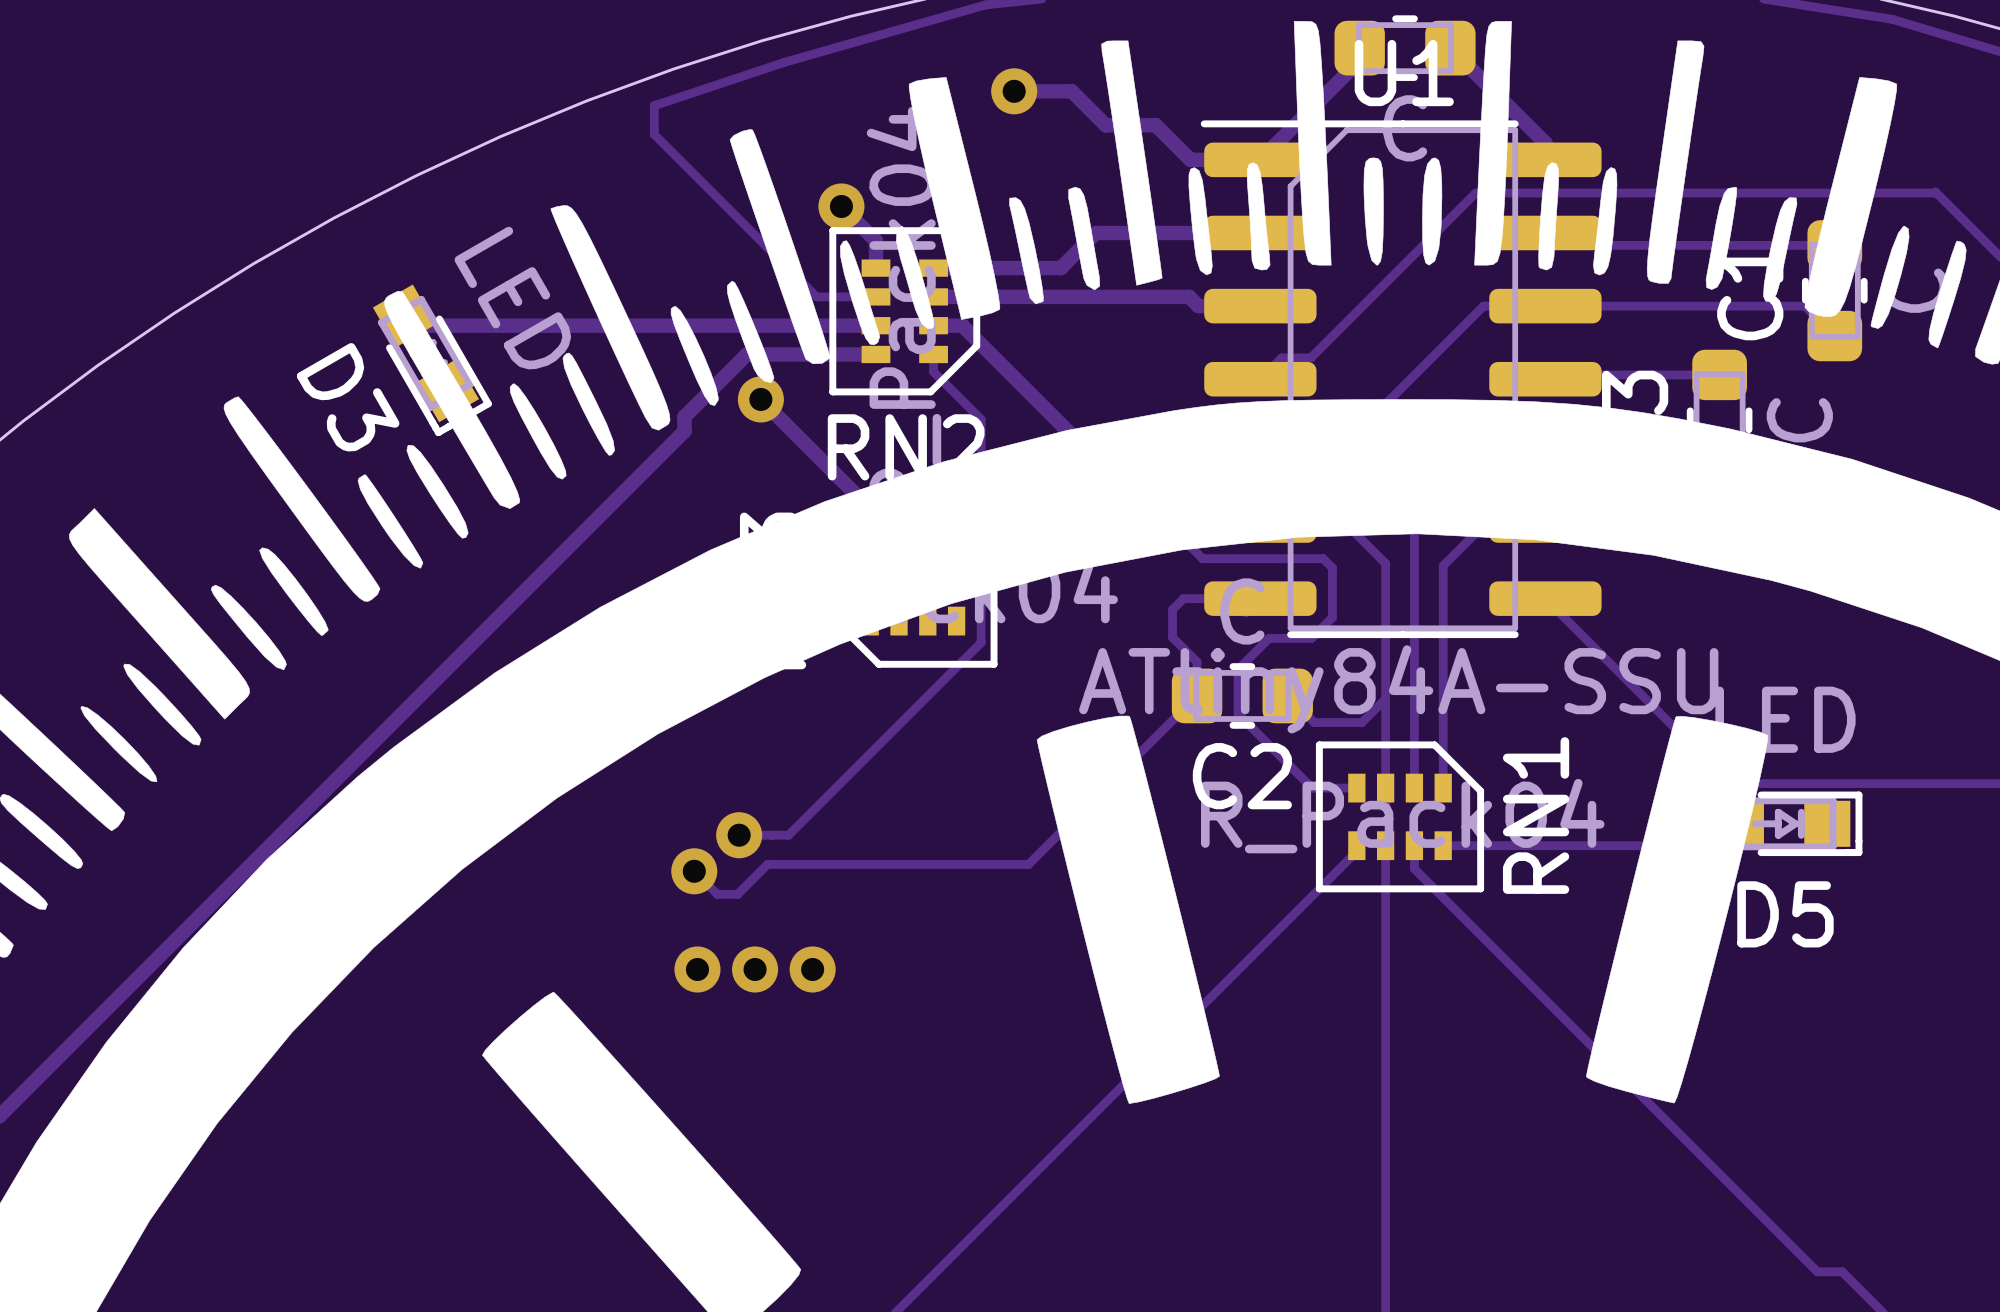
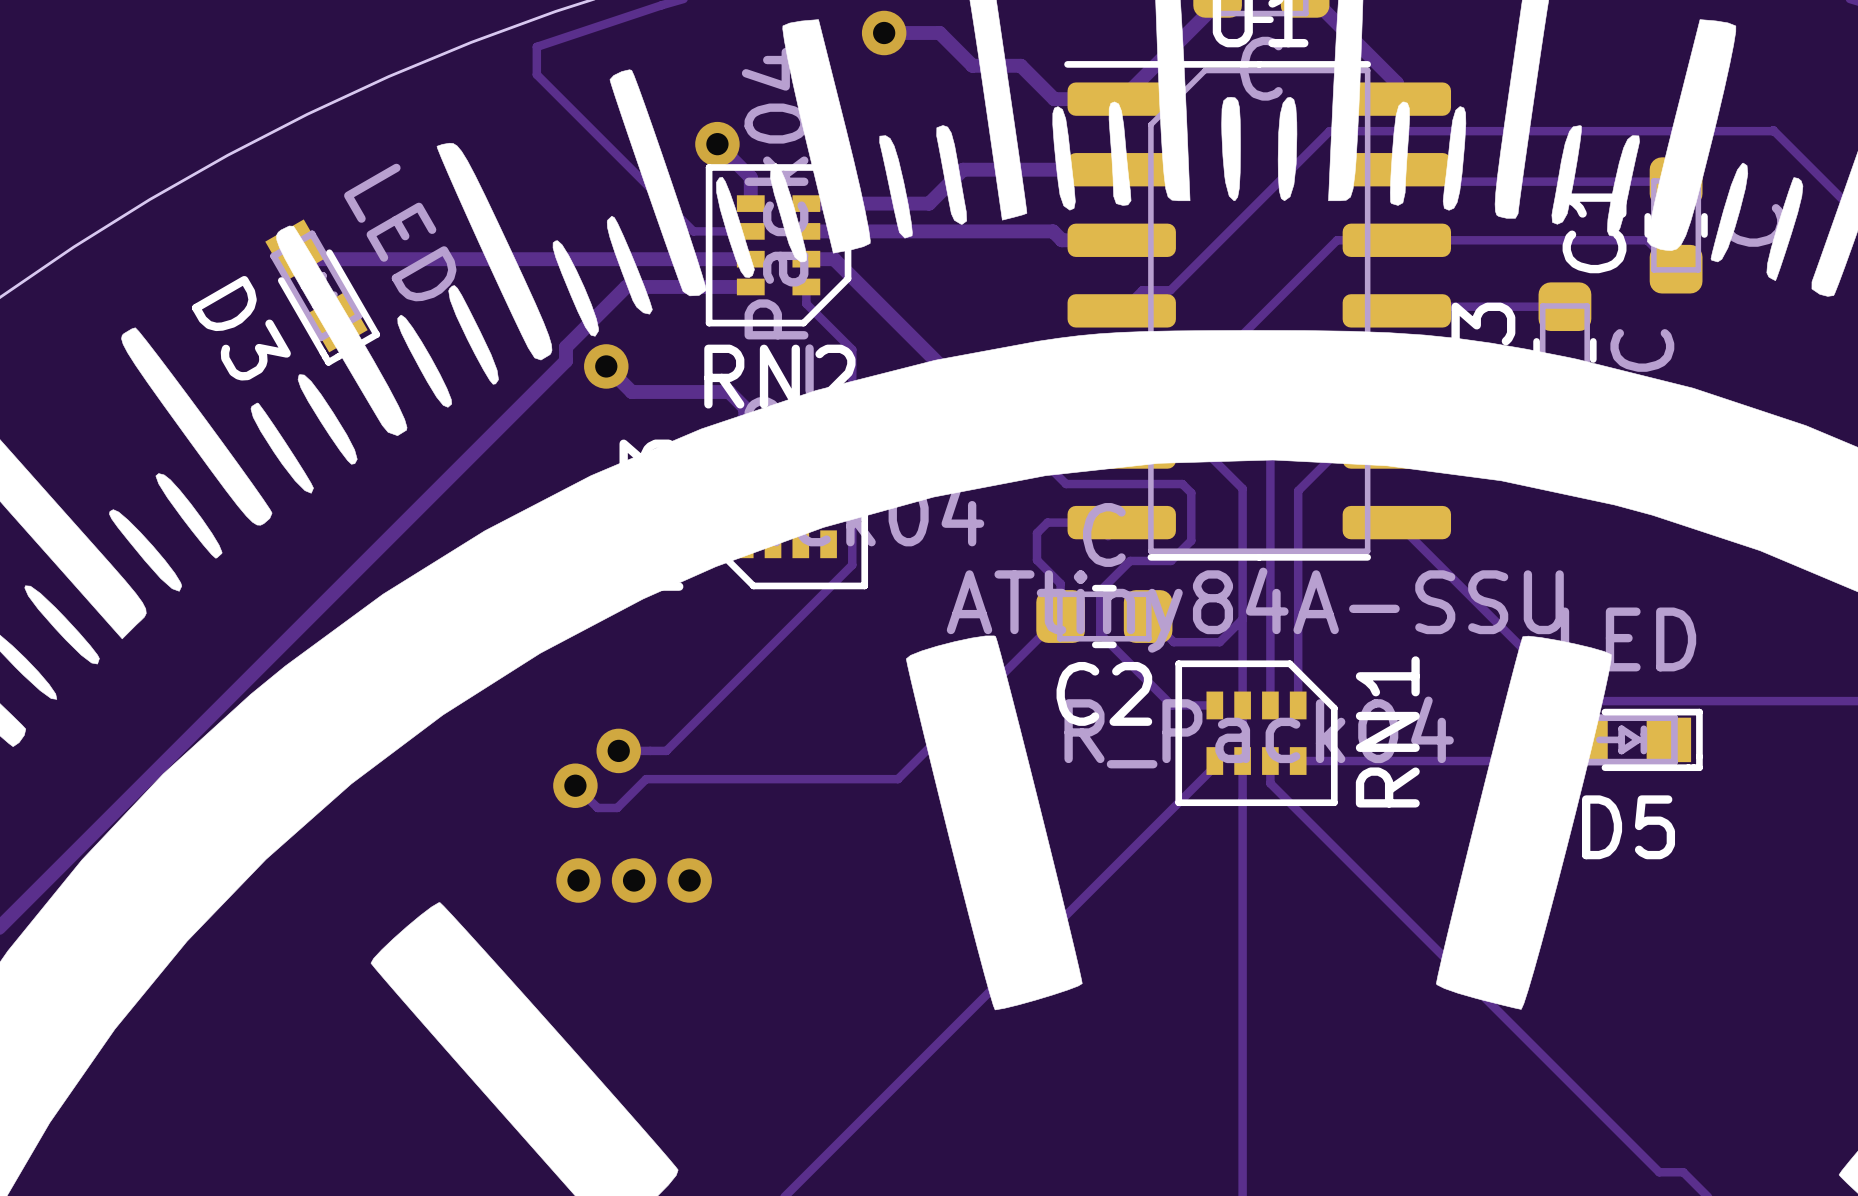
track: (760, 399) (870, 508) -> (606, 366) (631, 392) (729, 392) (745, 408) (745, 435)
via position: (760, 399) -> (606, 366)

